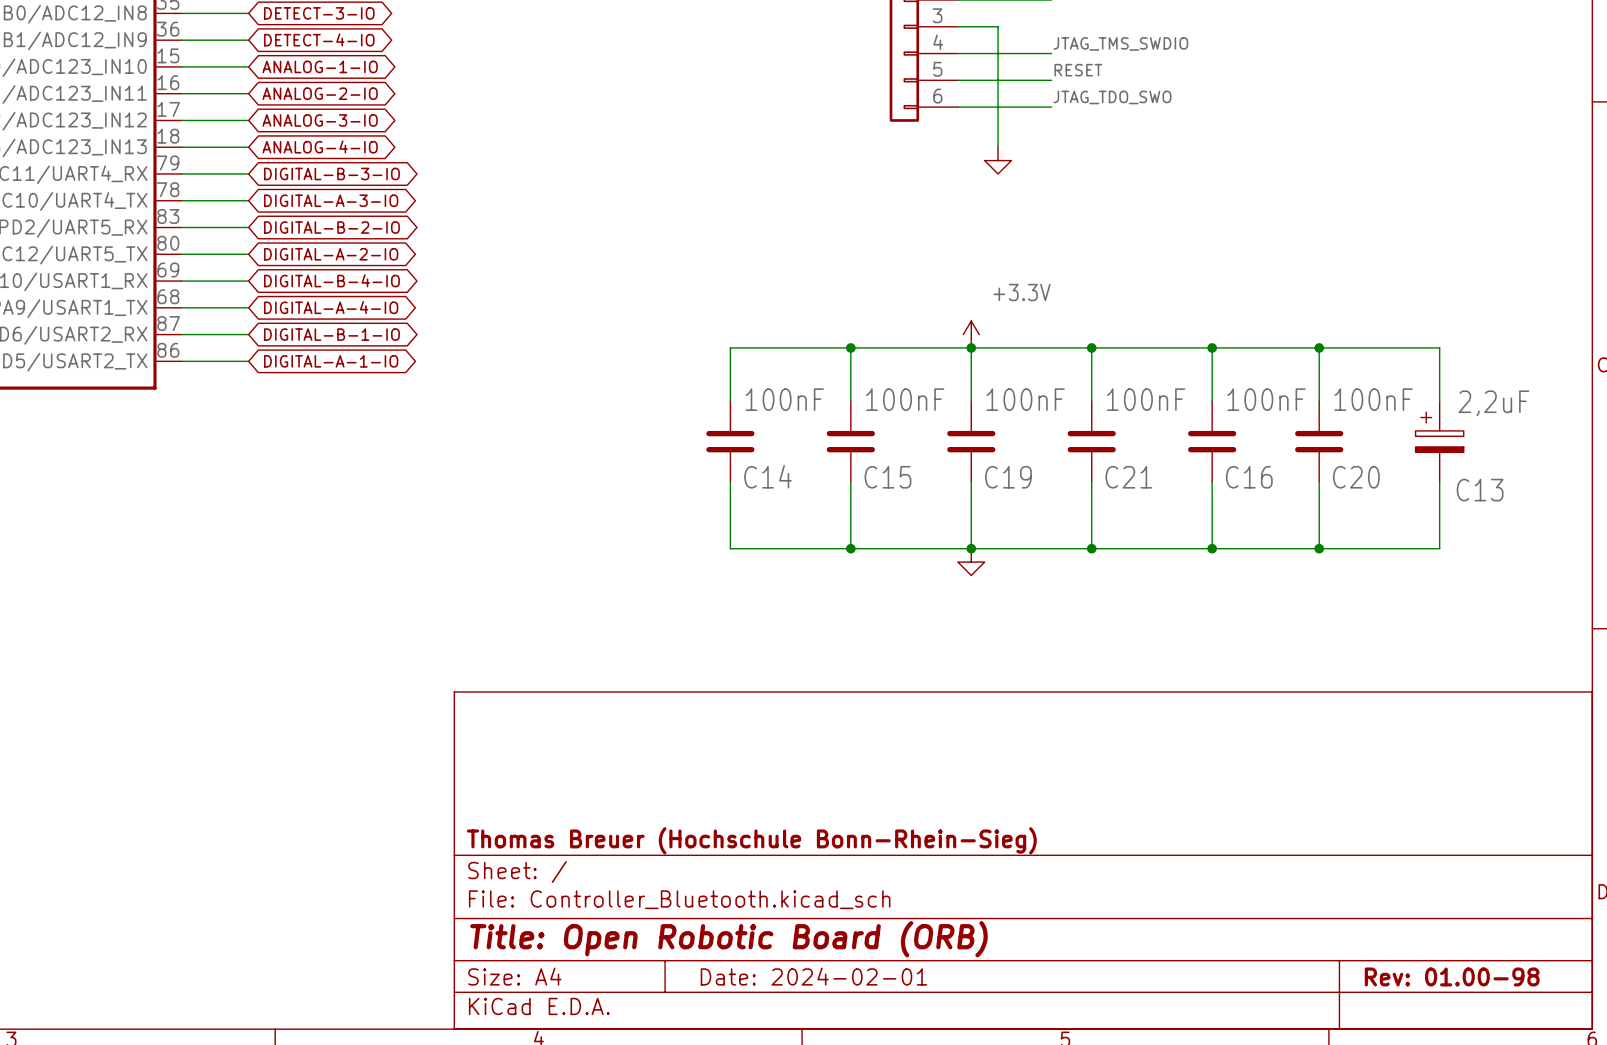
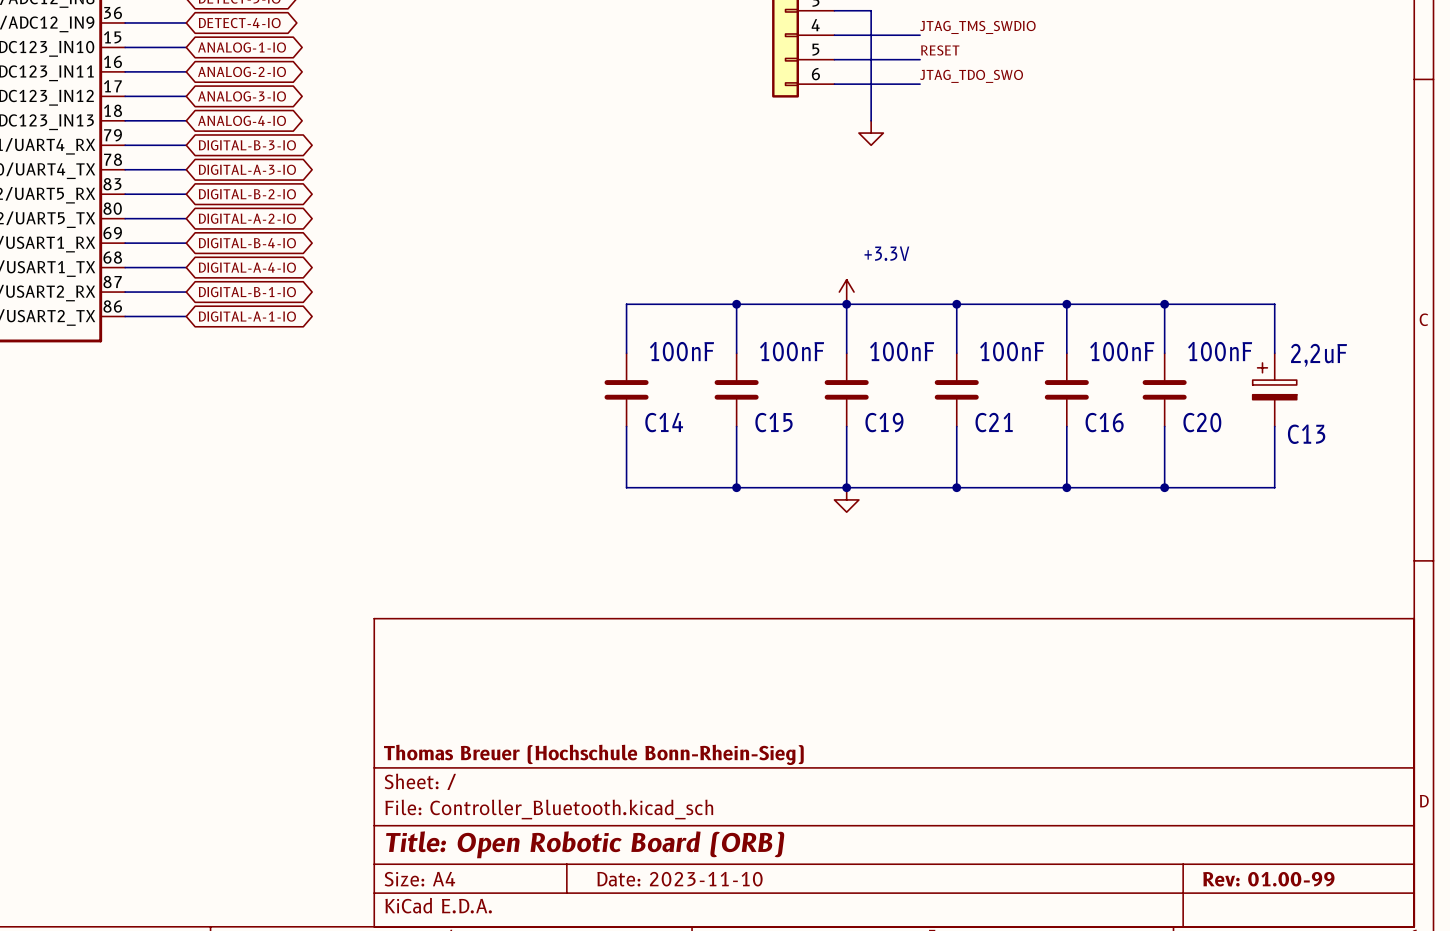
title block: Date: 2024-02-01 (814, 976) -> Date: 2023-11-10 (679, 879)
title block: Rev: 01.00-98 (1452, 976) -> Rev: 01.00-99 (1268, 879)

